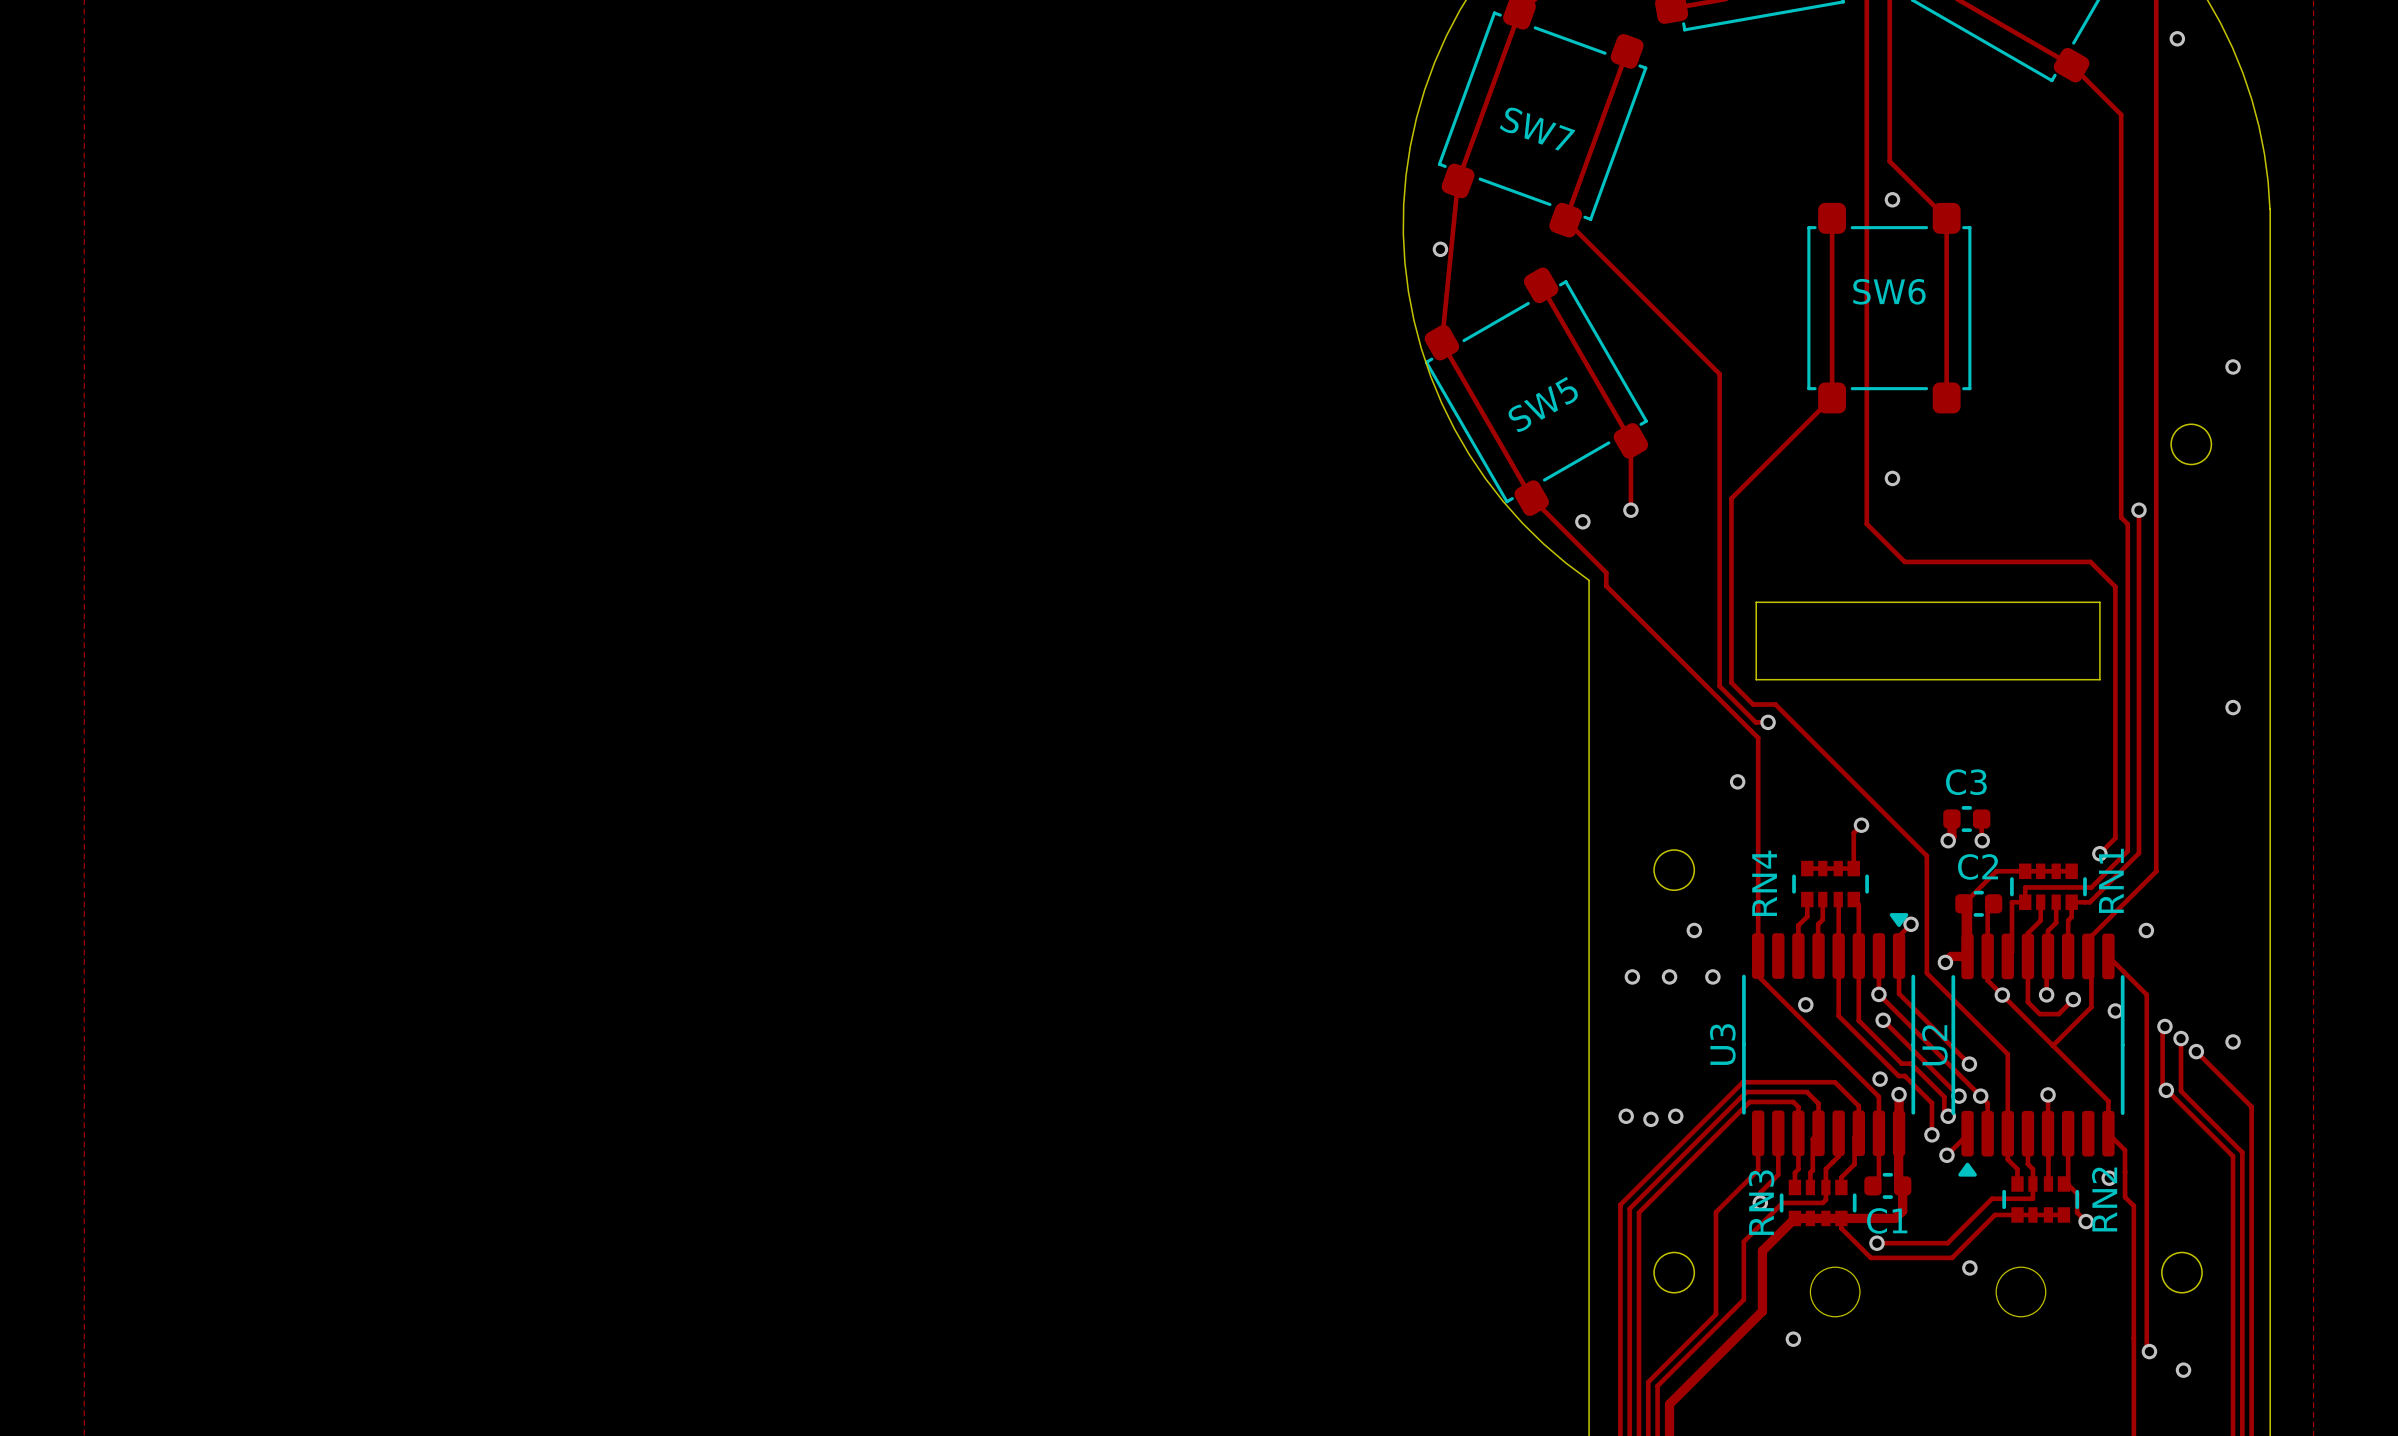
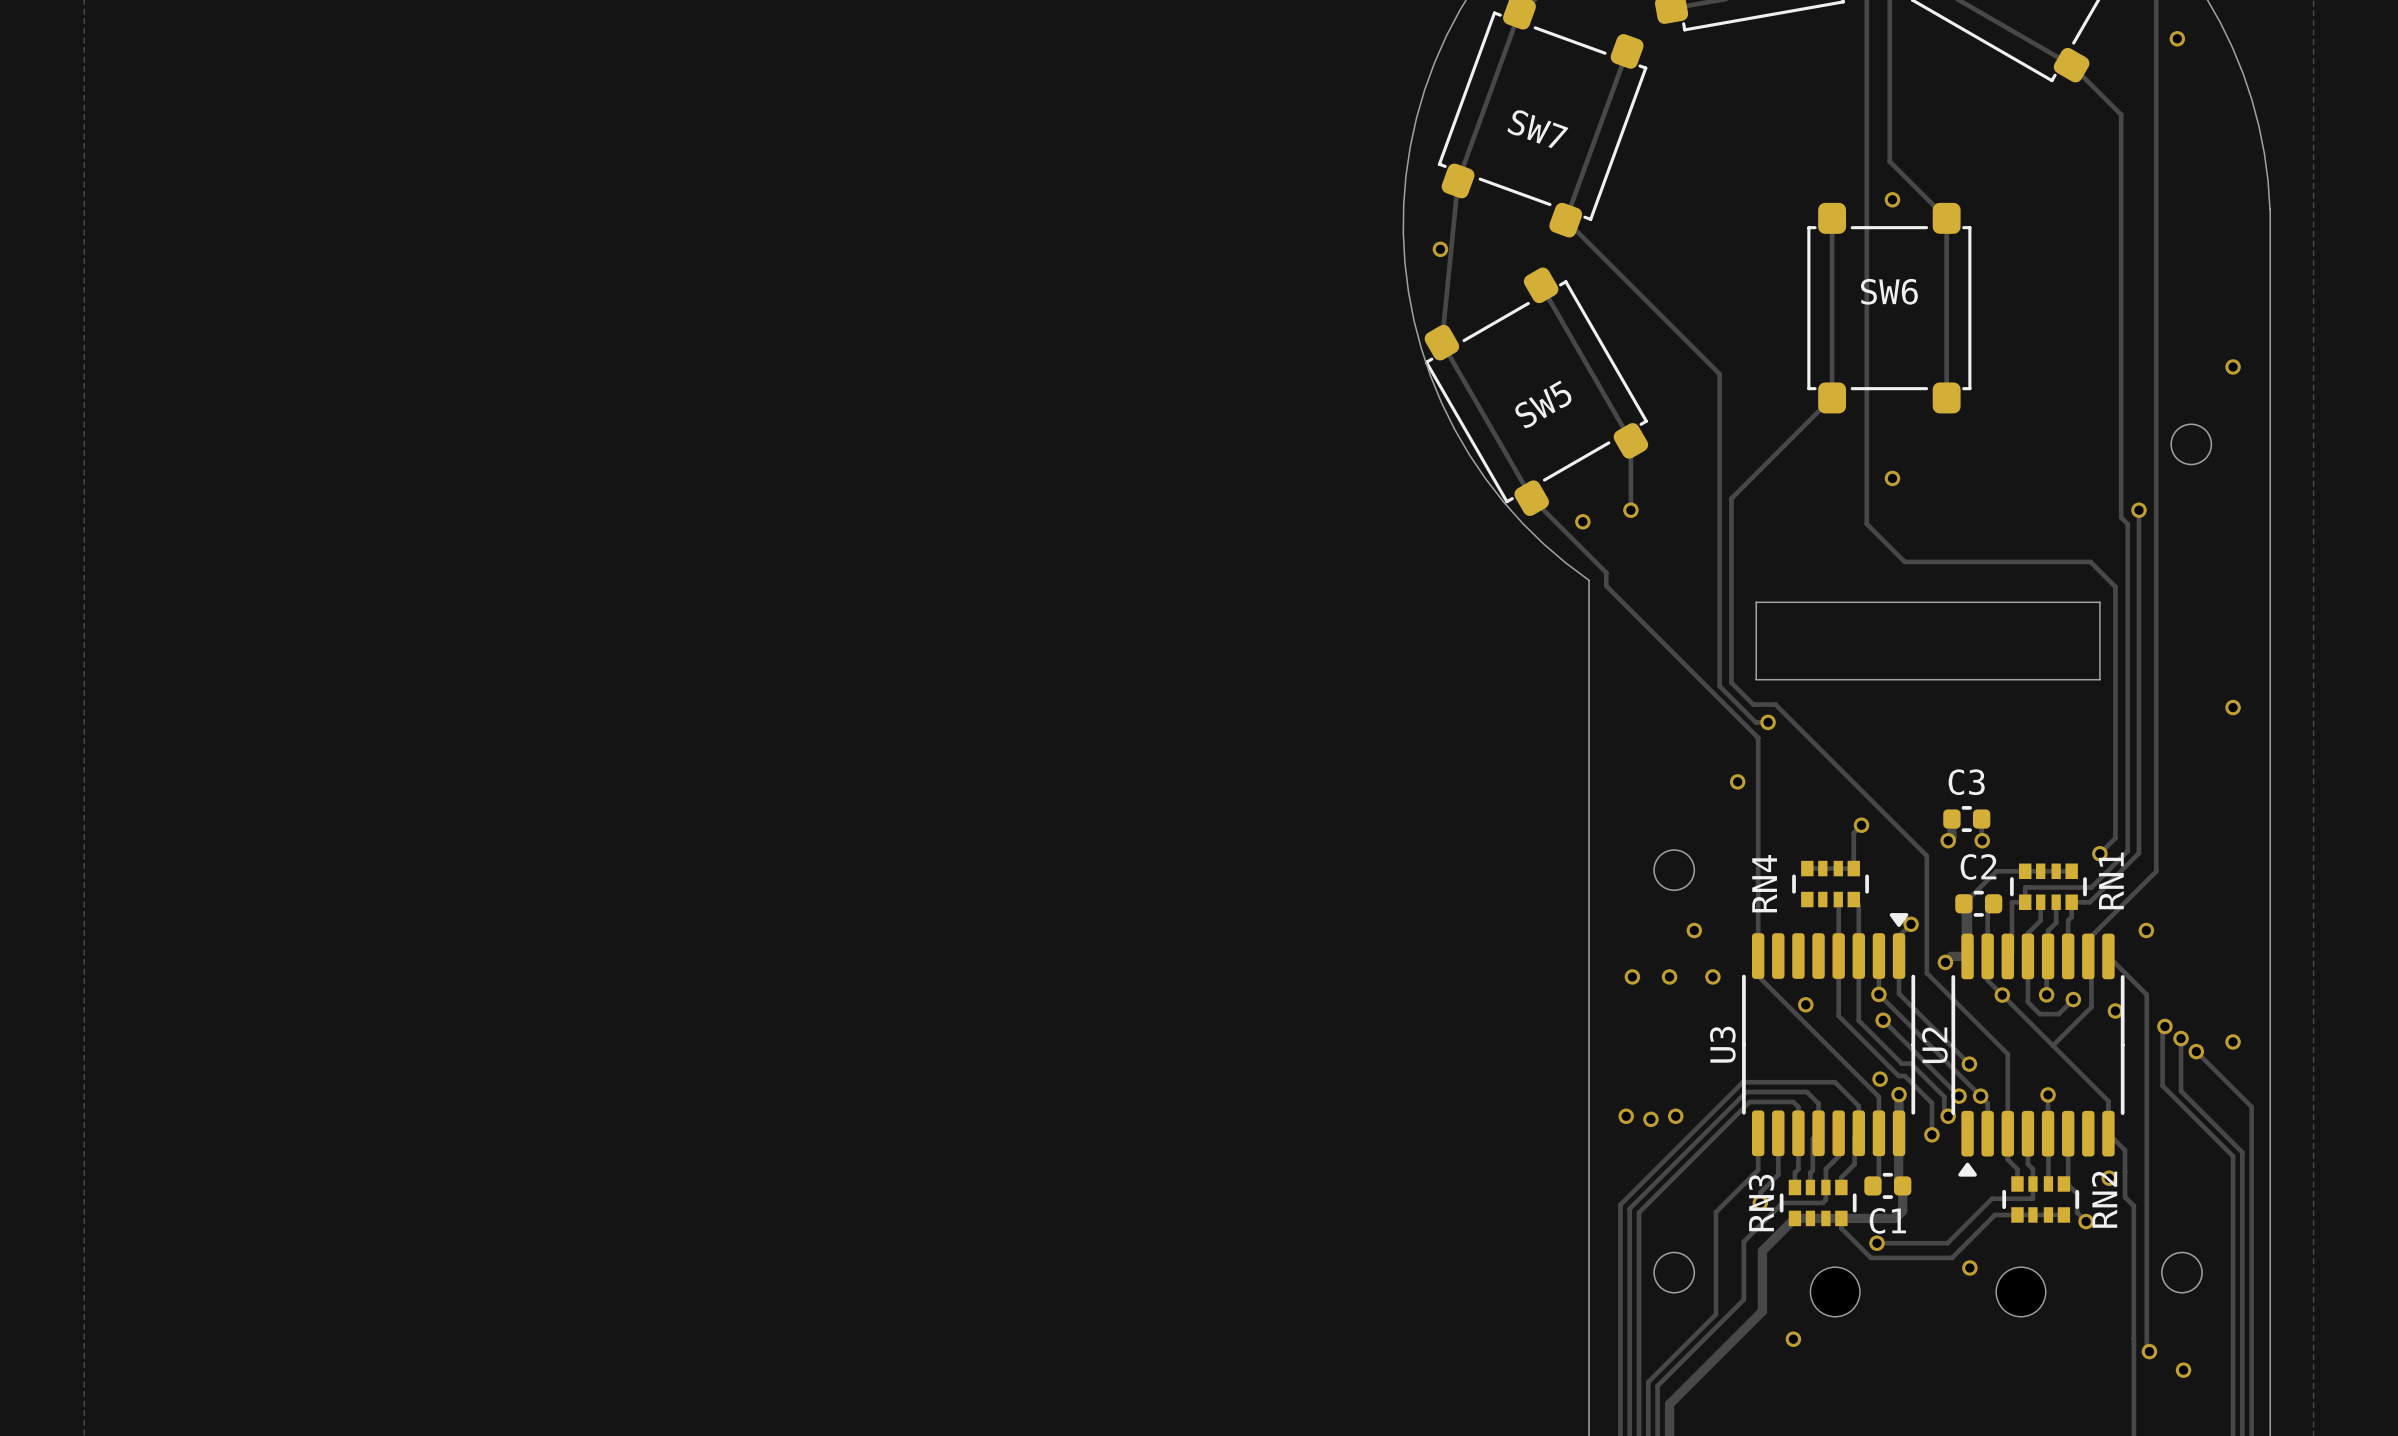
track: (1807, 899) (1807, 916) (1798, 925) (1798, 956) -> none
track: (1822, 899) (1822, 919) (1818, 924) (1818, 955) -> none
via: (2166, 1090) -> none
track: (1967, 1133) (1946, 1155) -> none
via: (1946, 1155) -> none

